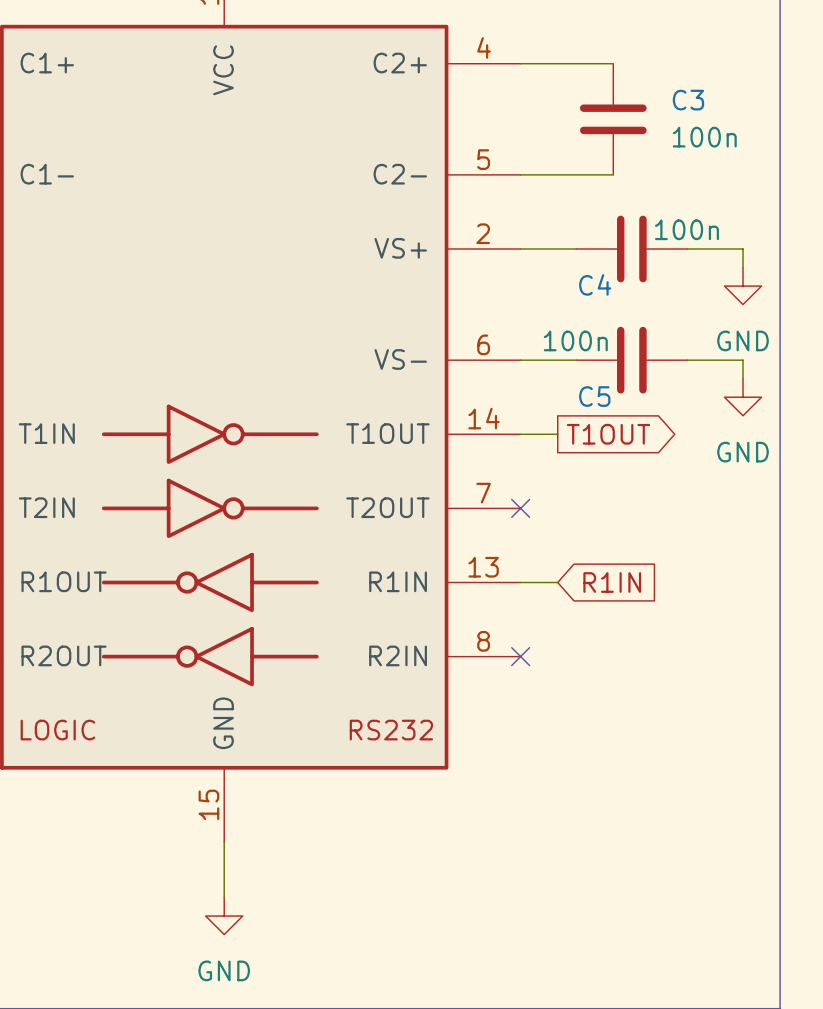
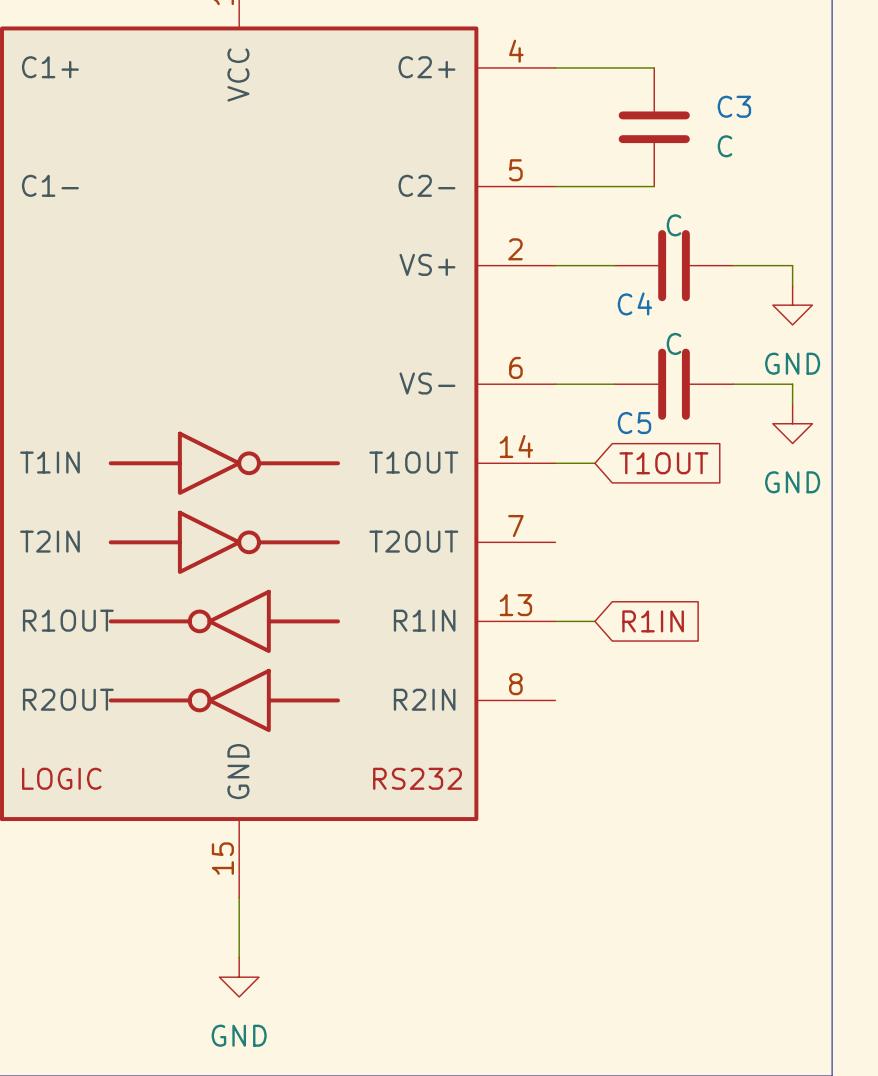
C3 value: 100n (704, 137) -> C (724, 146)
C4 value: 100n (686, 229) -> C (674, 225)
C5 value: 100n (575, 340) -> C (674, 343)
global label shape: output (608, 434) -> input (663, 463)
no-connect mark: (520, 508) -> none
no-connect mark: (520, 656) -> none

